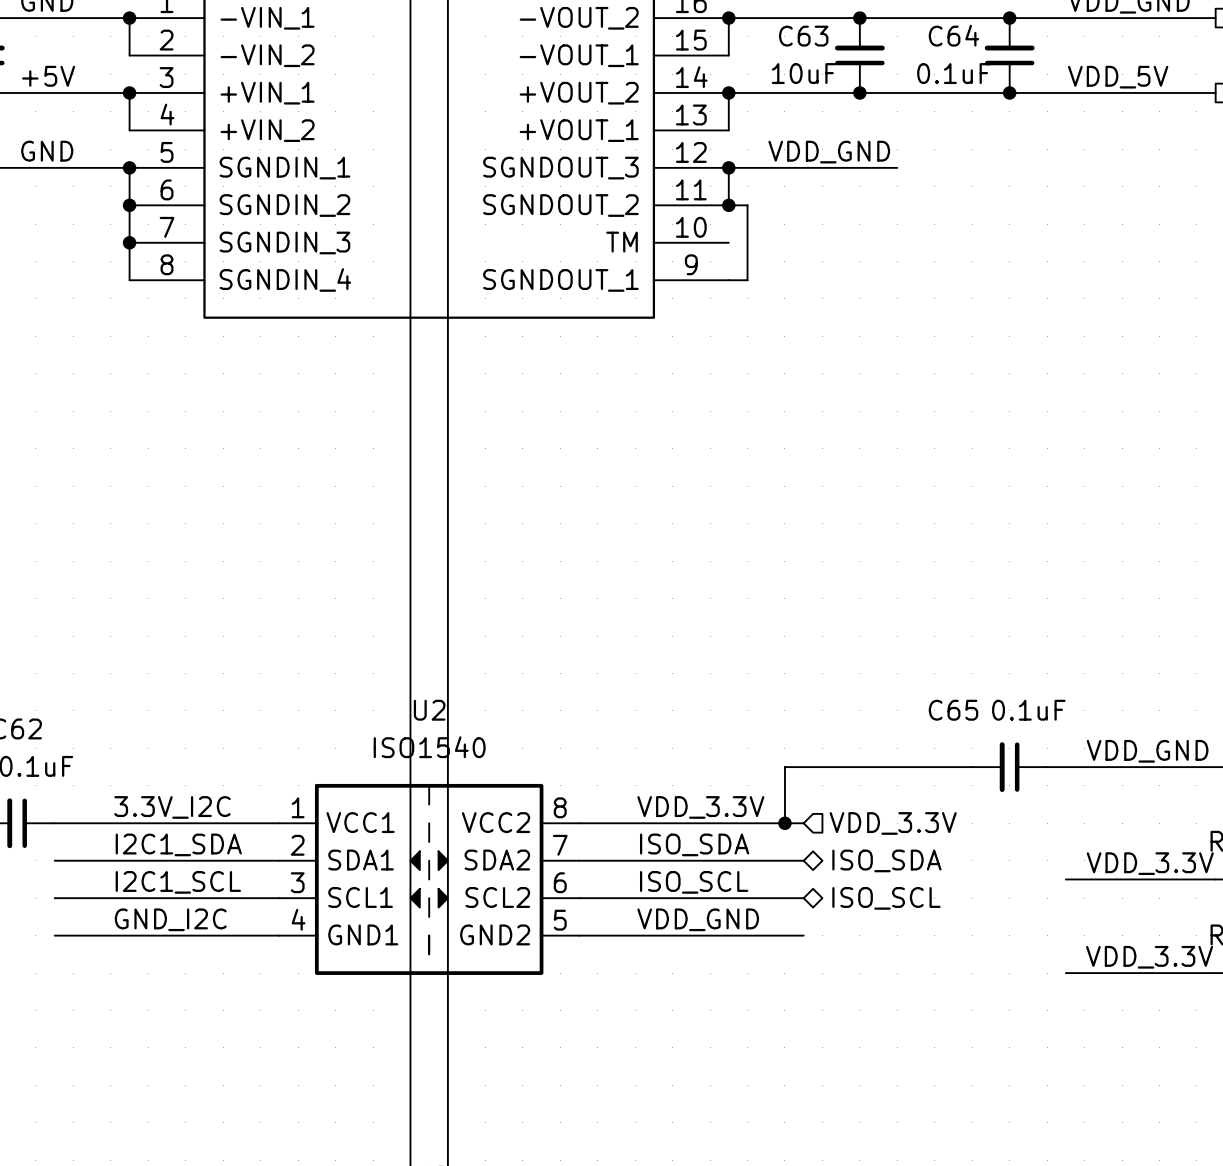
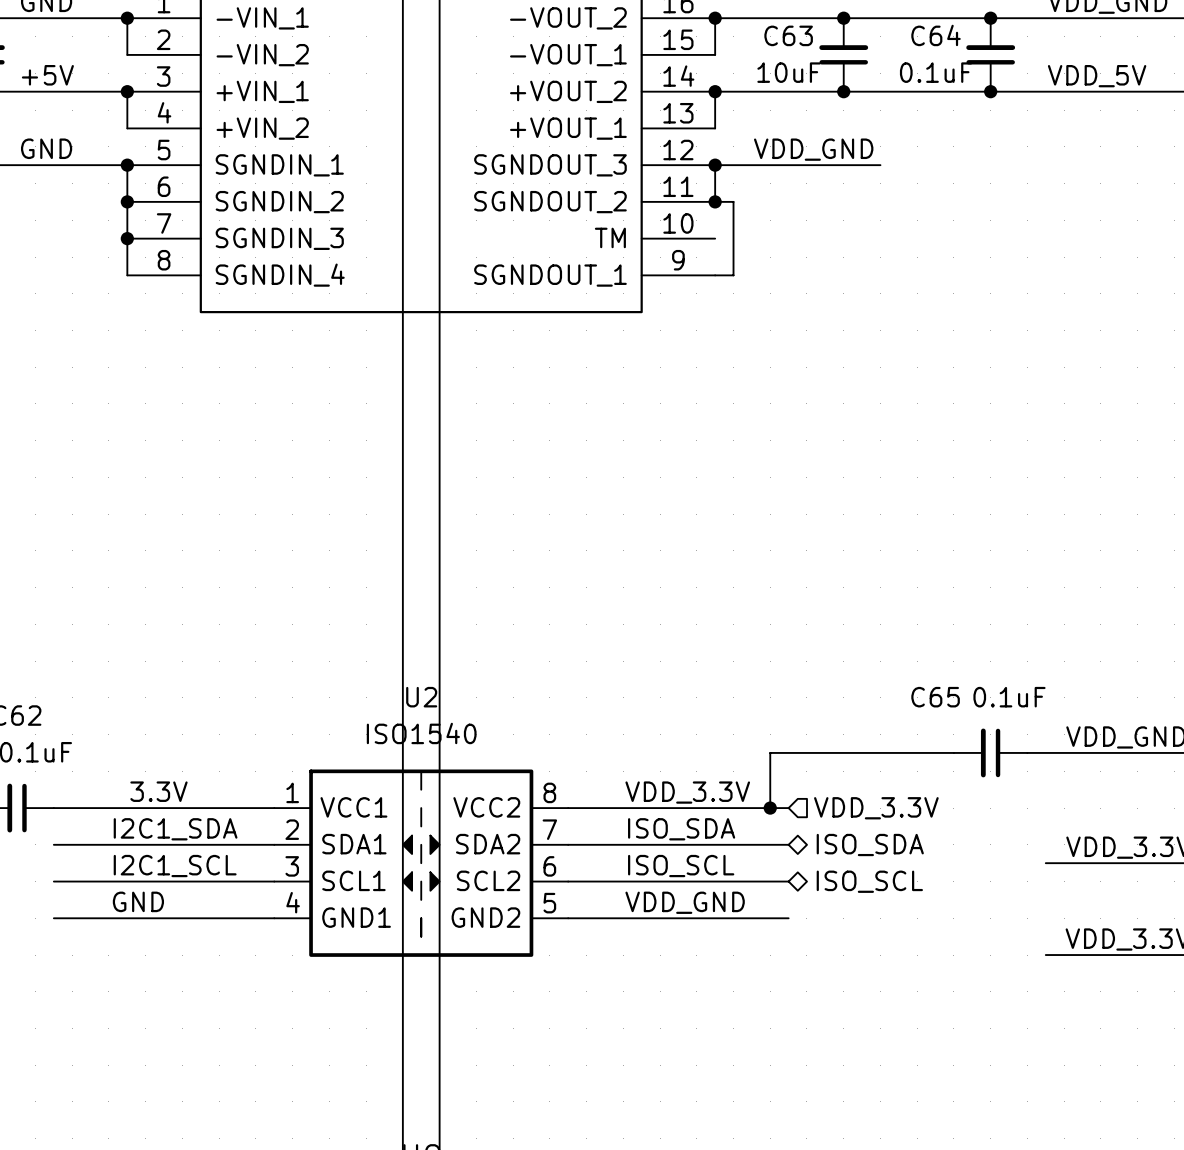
label: 3.3V_I2C (172, 807) -> 3.3V (158, 791)
label: GND_I2C (170, 919) -> GND (138, 901)

